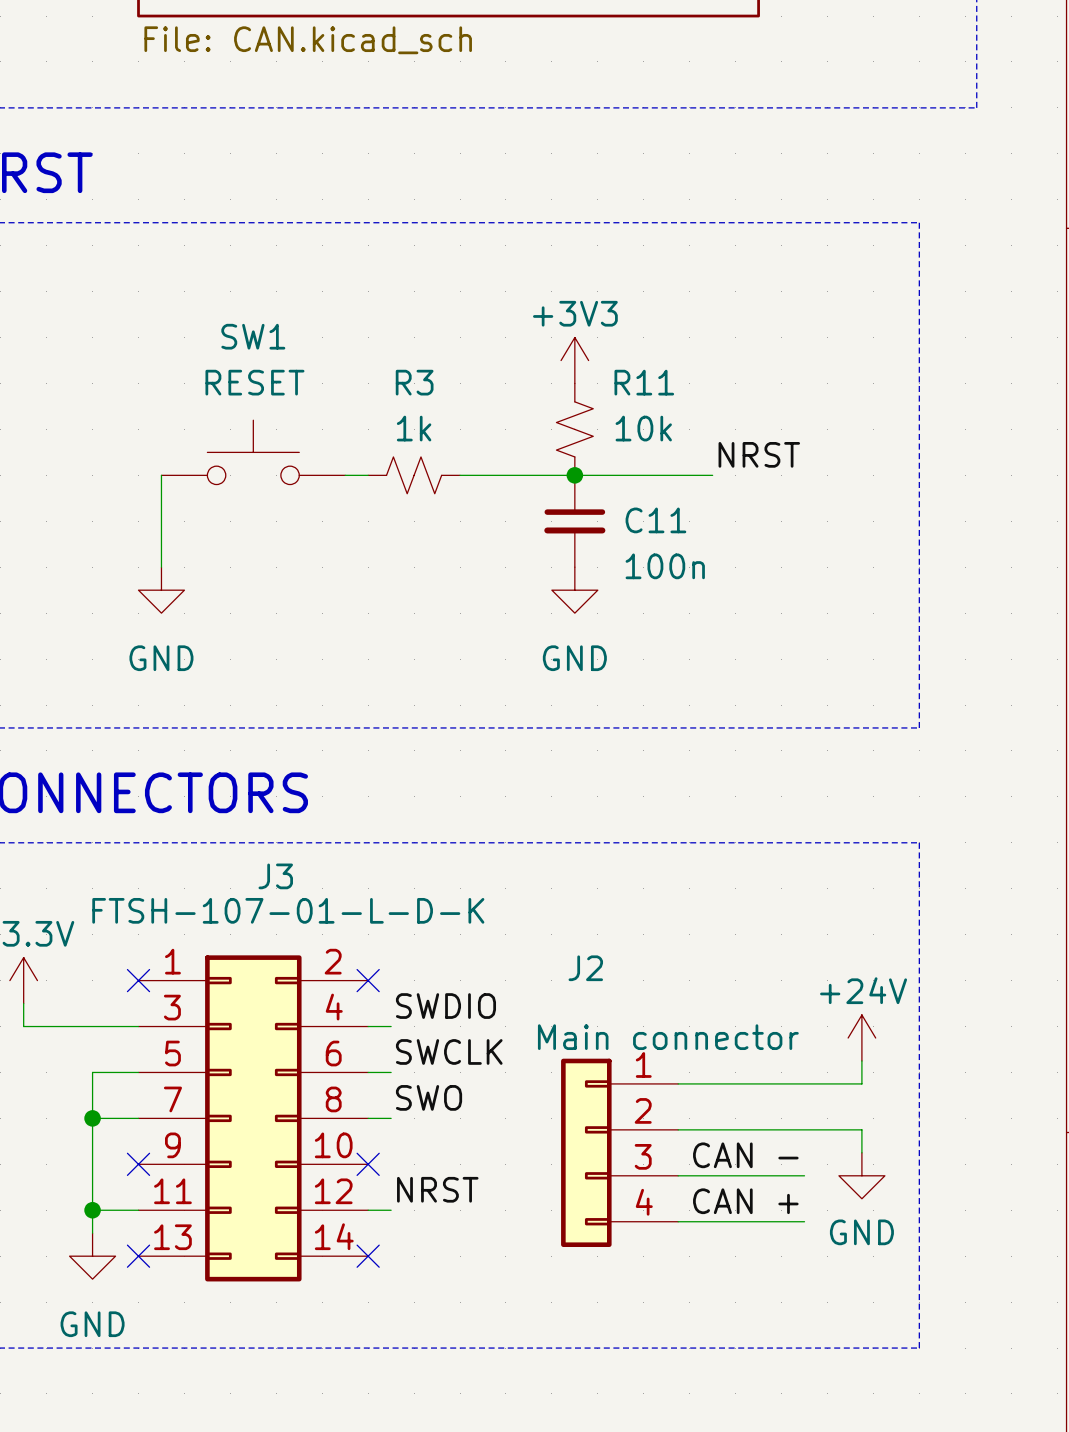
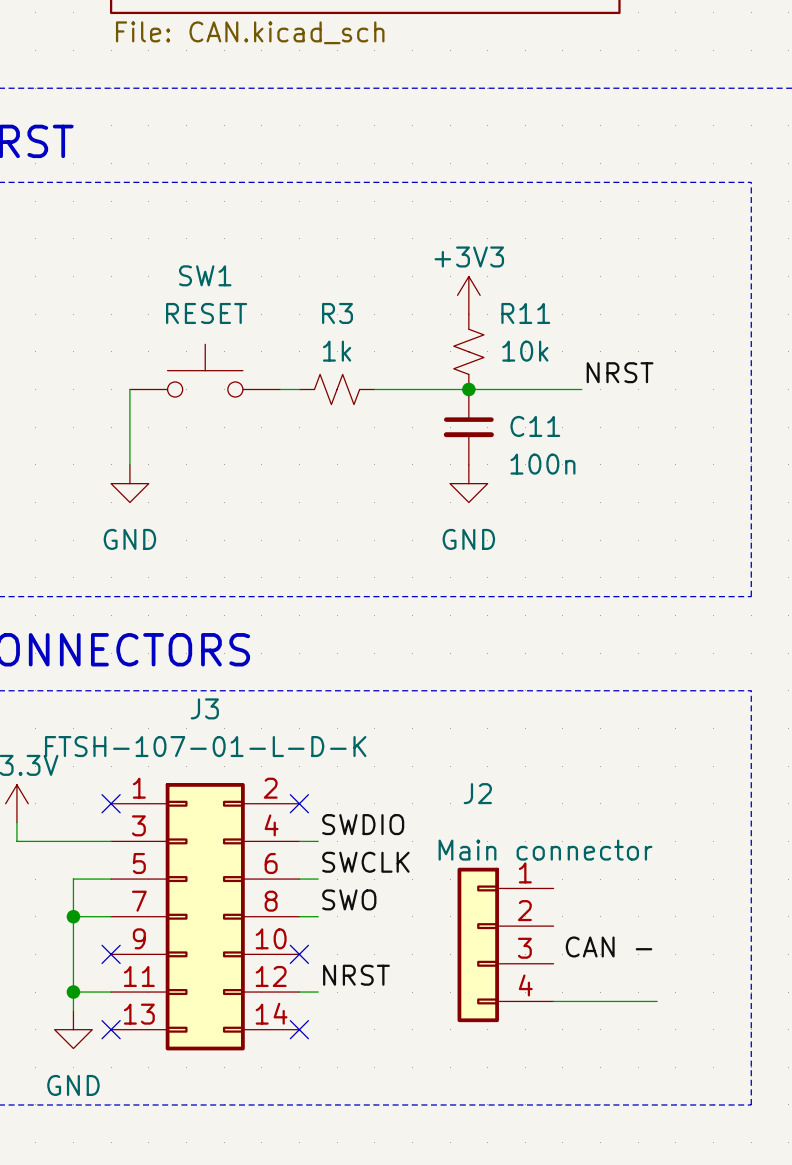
J3 name position: J3 (275, 876) -> J3 (204, 708)
J3 value position: FTSH-107-01-L-D-K (288, 910) -> FTSH-107-01-L-D-K (205, 746)
power symbol: +24V (861, 1038) -> none
wire: (861, 1060) (861, 1083) (678, 1083) -> none
wire: (678, 1129) (861, 1129) (861, 1152) -> none
wire: (678, 1175) (804, 1175) -> none
power symbol: GND (861, 1175) -> none
label: CAN + (745, 1201) -> none

